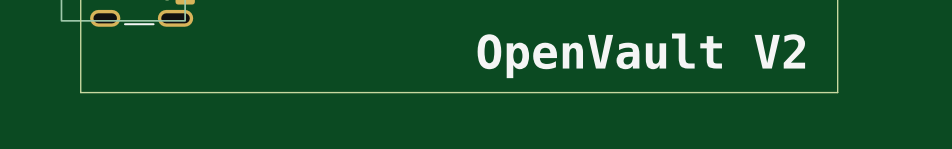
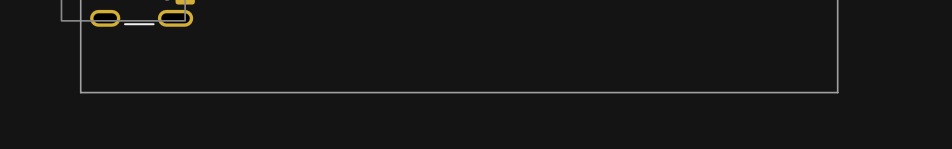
text: OpenVault V2 (641, 55) -> none

